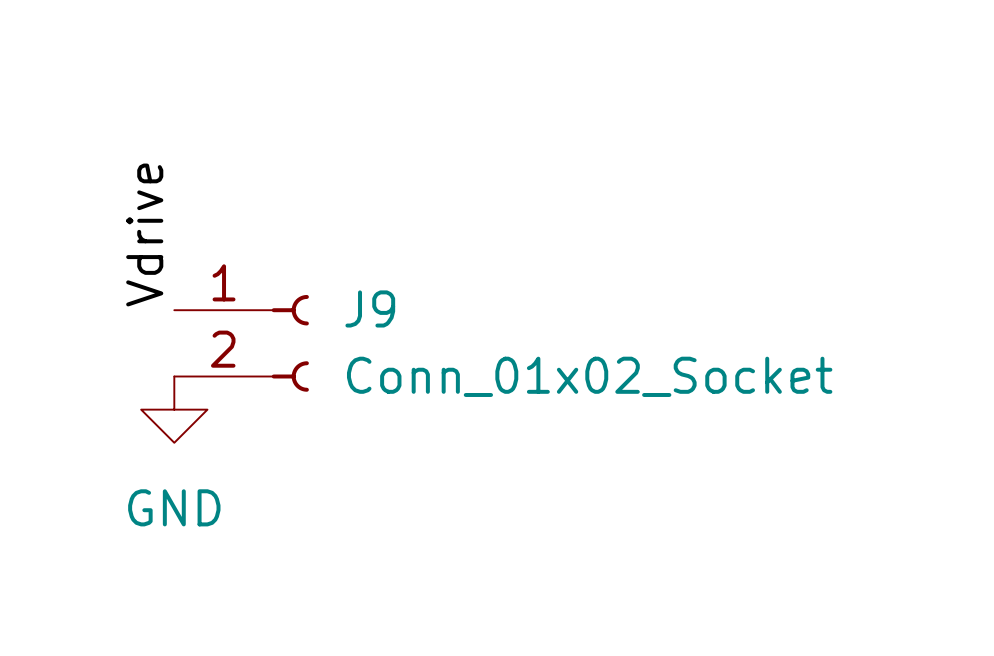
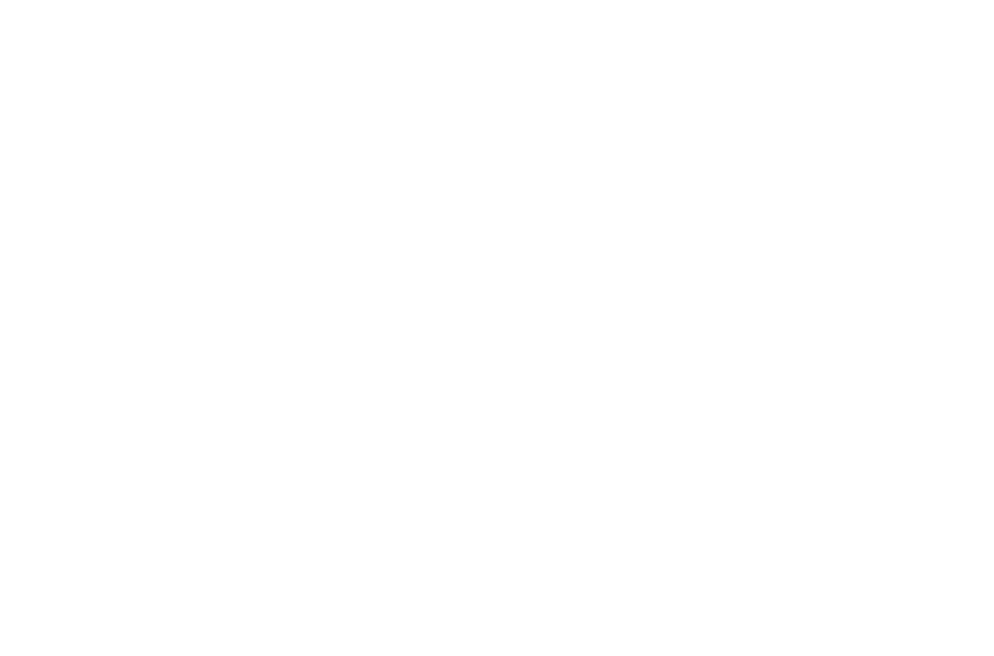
label: Vdrive (144, 234) -> none
J9: Conn_01x02_Socket (241, 343) -> none
power symbol: GND (174, 409) -> none

